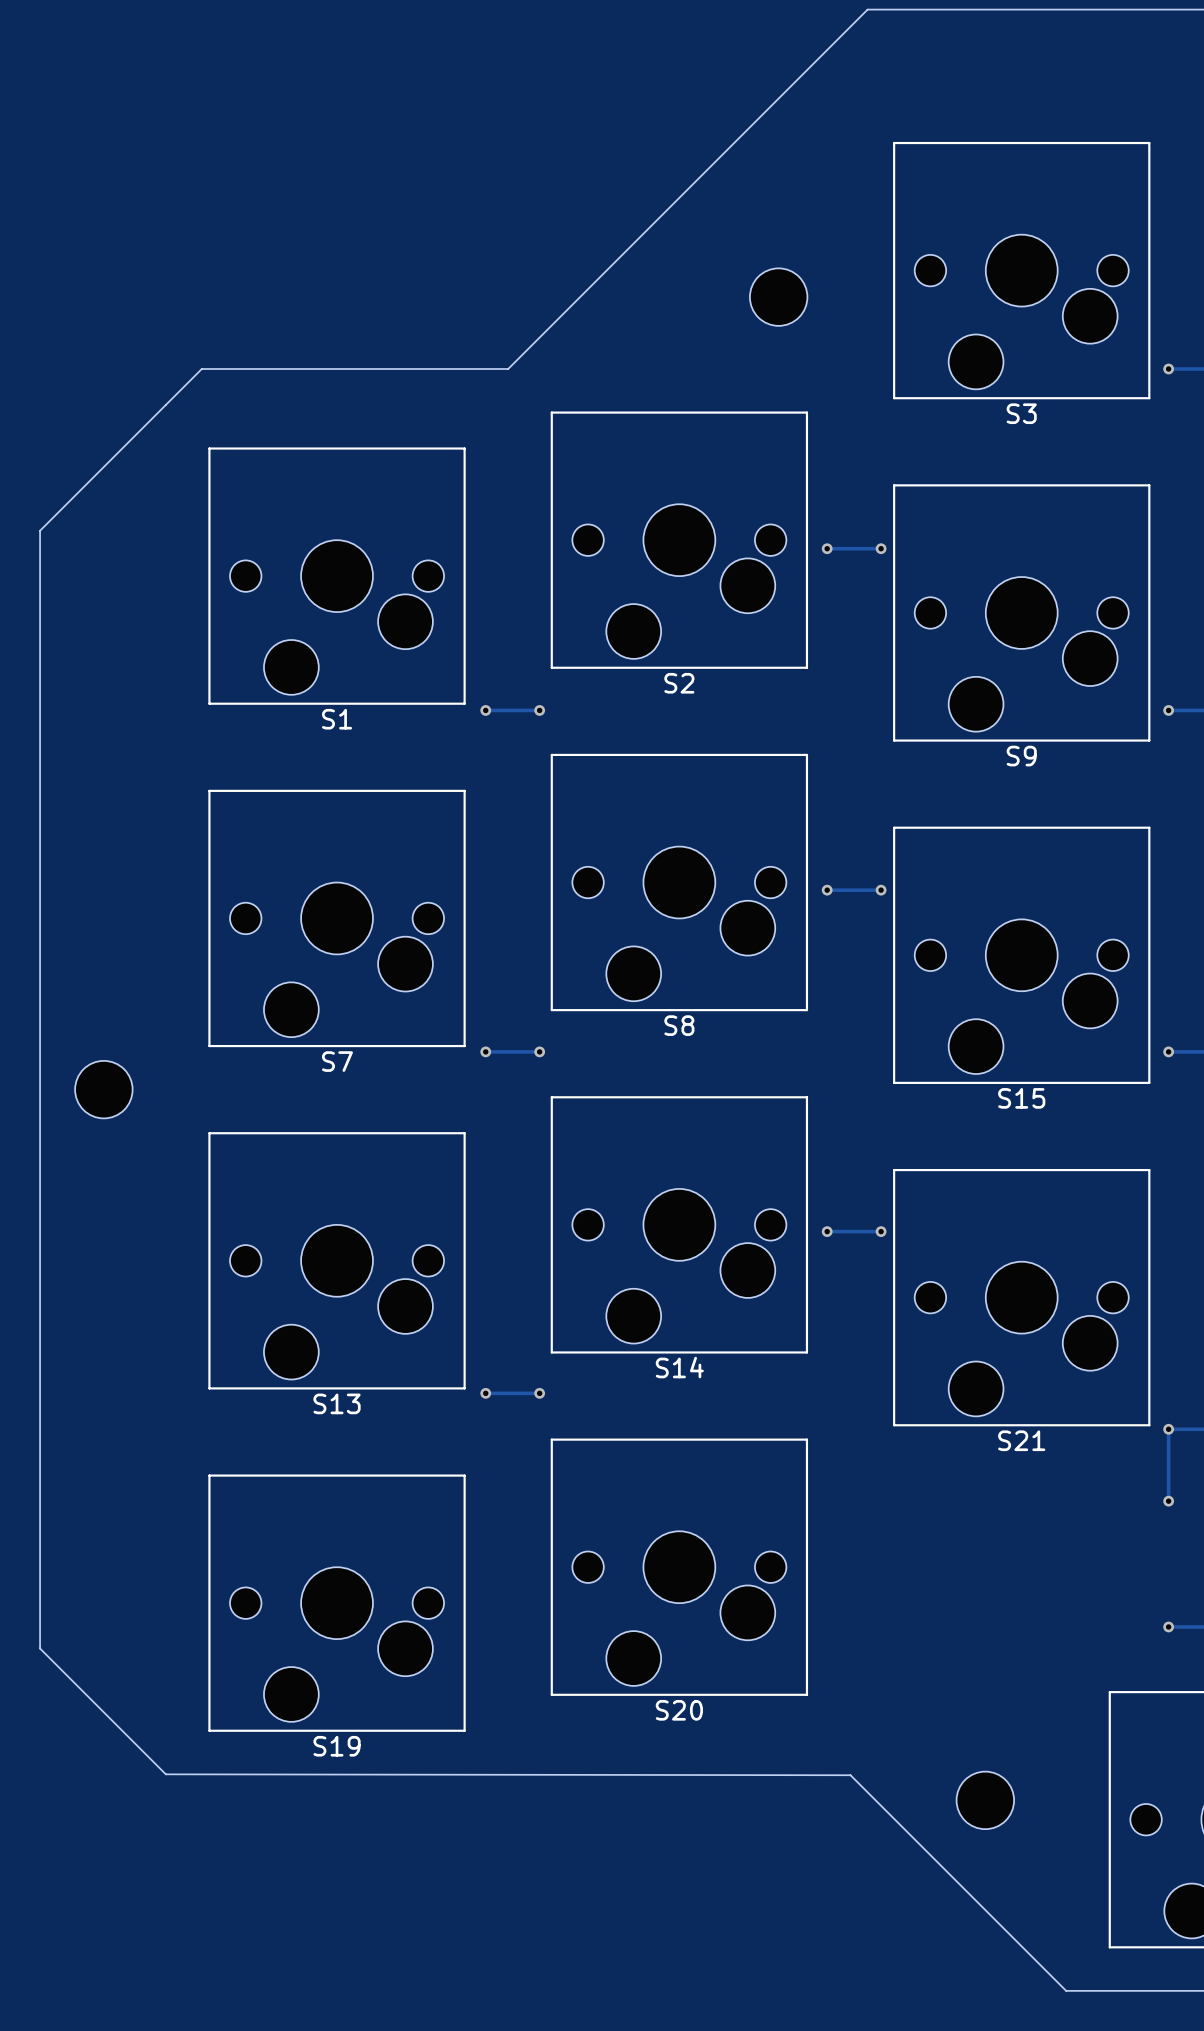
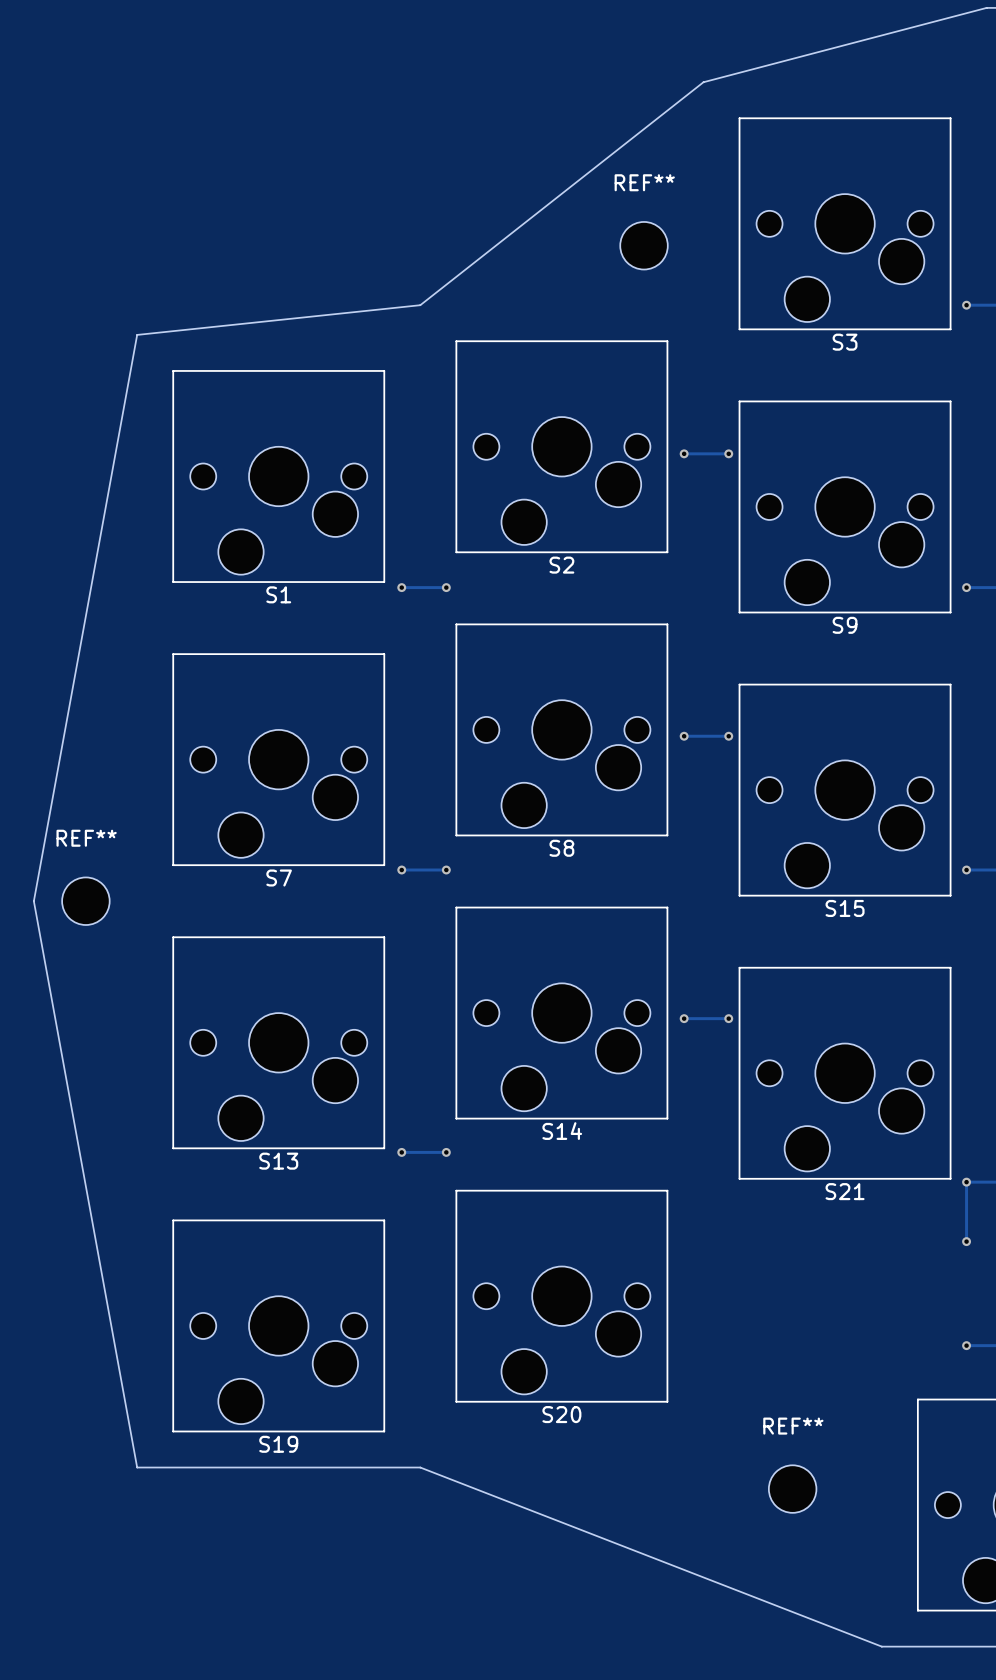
board edge: (1192, 9) (867, 9) (508, 369) (201, 369) (40, 530) (40, 1648) (165, 1774) (850, 1775) (1066, 1990) -> (986, 7) (703, 82) (420, 305) (137, 334) (33, 901) (137, 1467) (420, 1467) (881, 1646)
REF** name: none -> REF** (644, 182)
REF** name: none -> REF** (86, 838)
REF**: none -> (792, 1489)
part: (985, 1800) -> none

